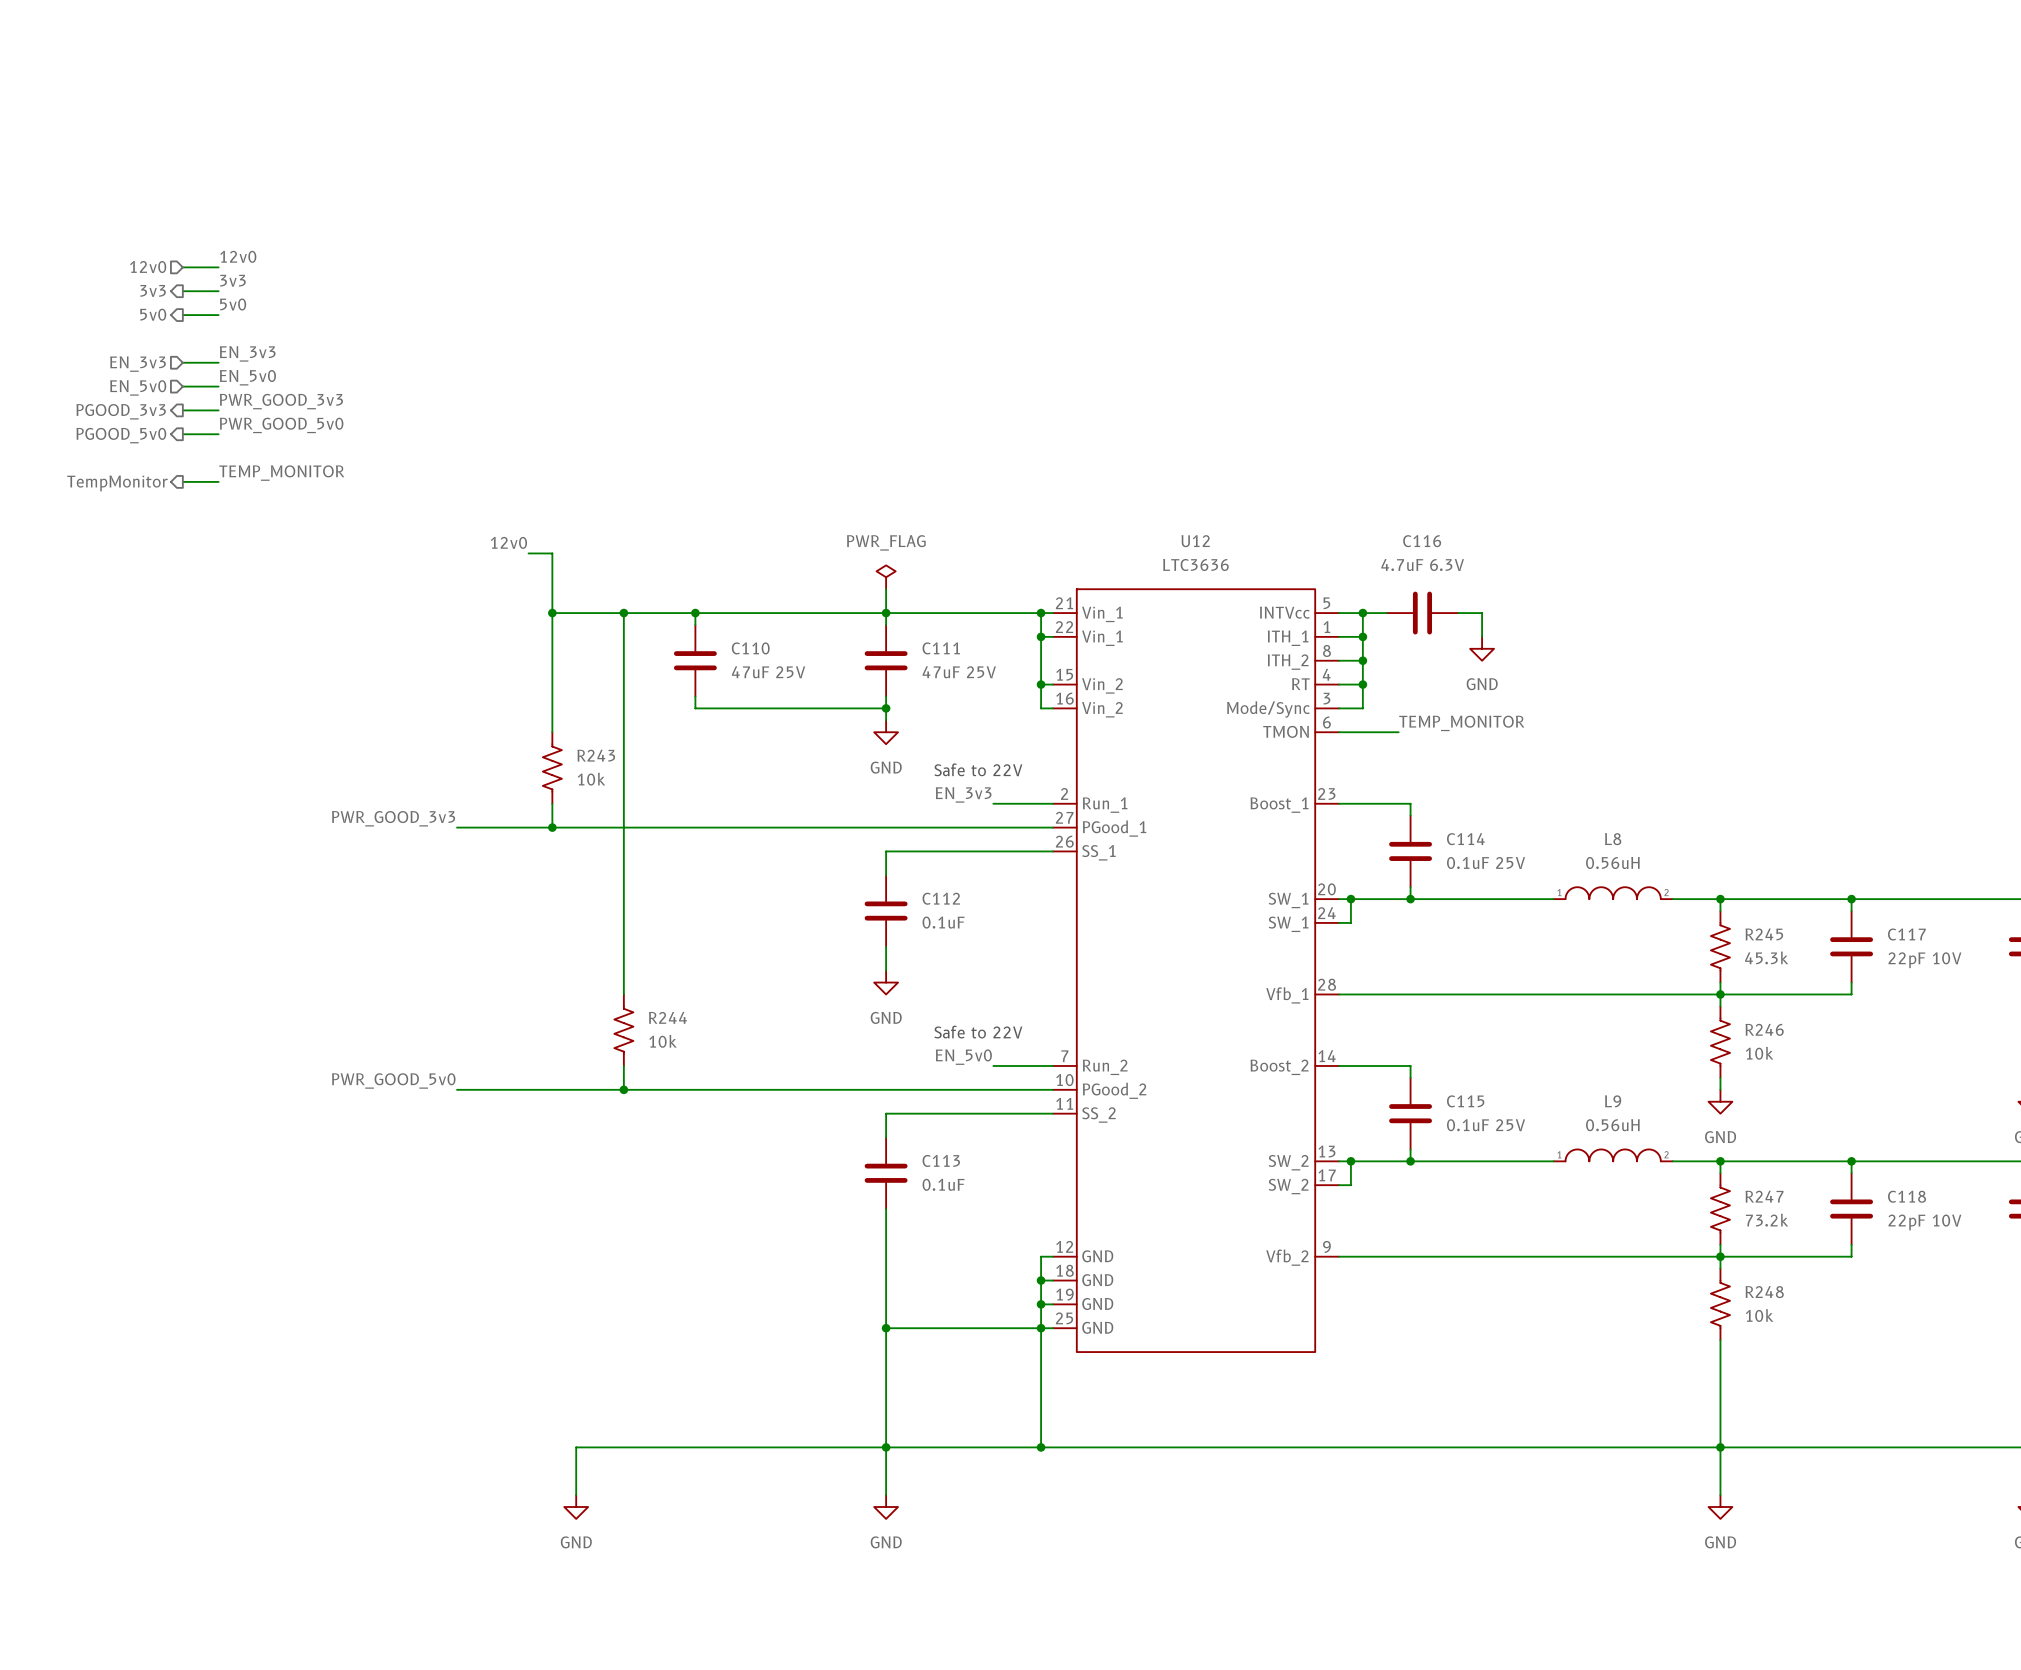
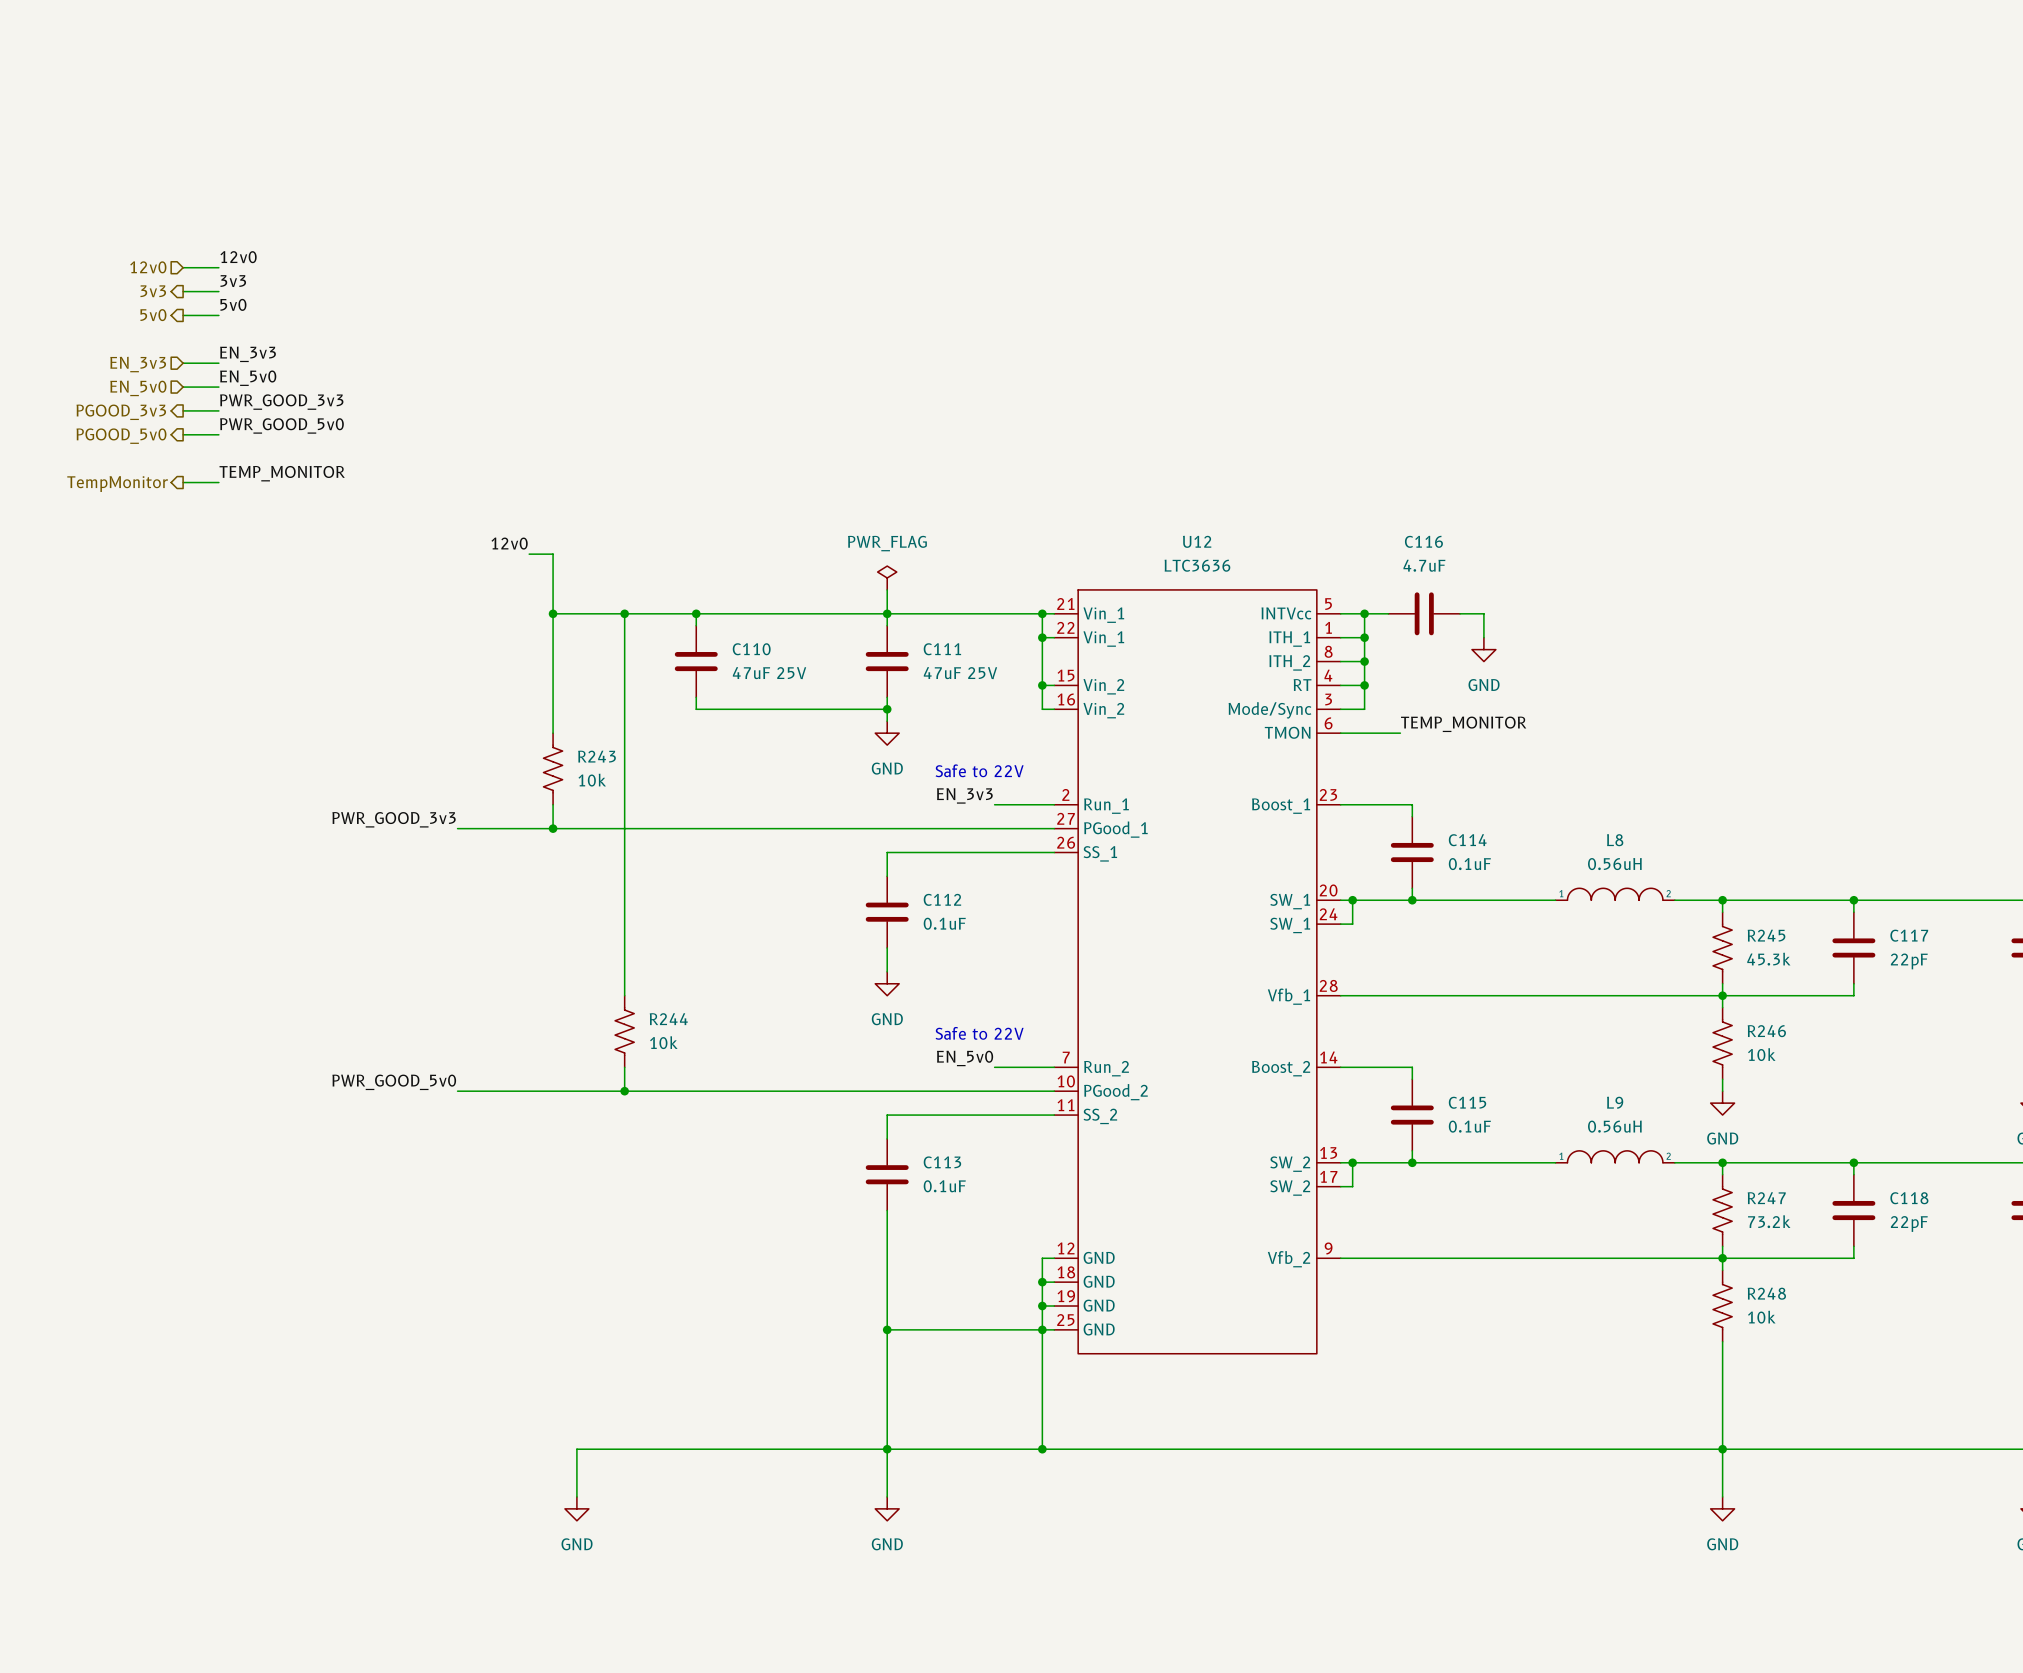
C116 value: 4.7uF 6.3V (1422, 565) -> 4.7uF (1424, 565)
C114 value: 0.1uF 25V (1486, 862) -> 0.1uF (1469, 864)
C117 value: 22pF 10V (1924, 960) -> 22pF (1909, 961)
C115 value: 0.1uF 25V (1486, 1125) -> 0.1uF (1469, 1126)
C118 value: 22pF 10V (1924, 1222) -> 22pF (1909, 1223)

